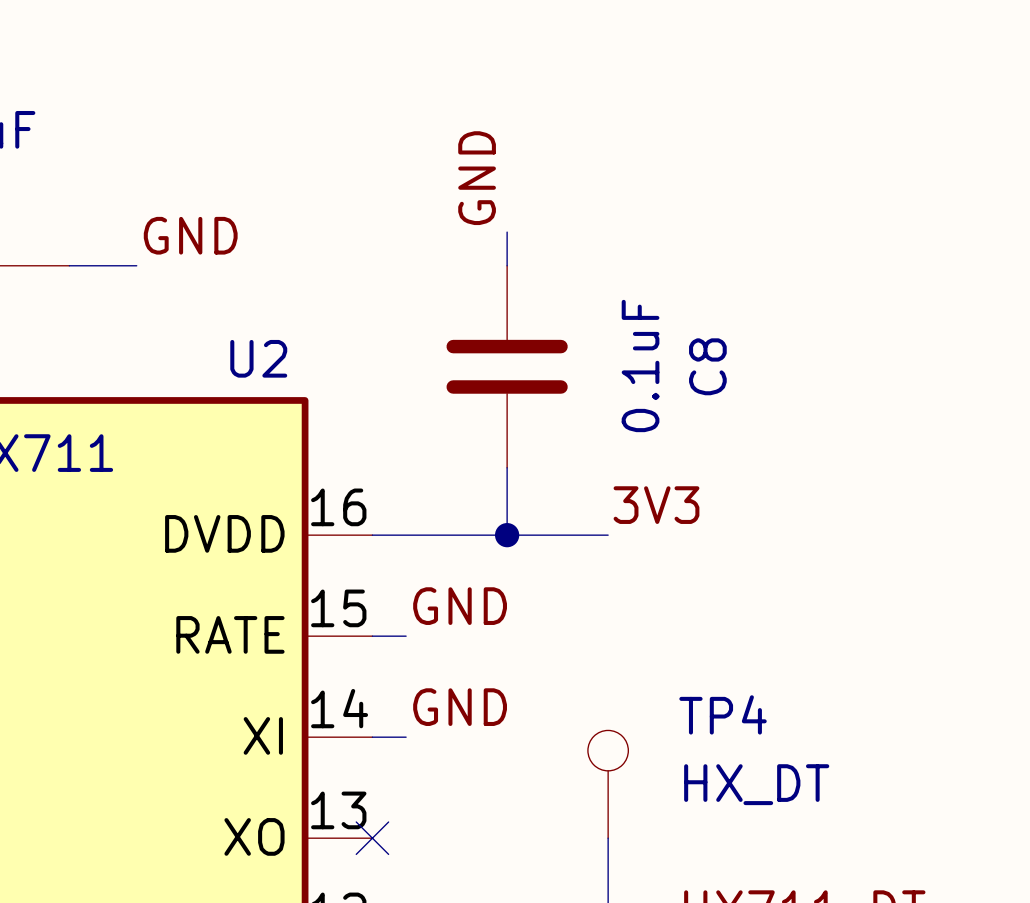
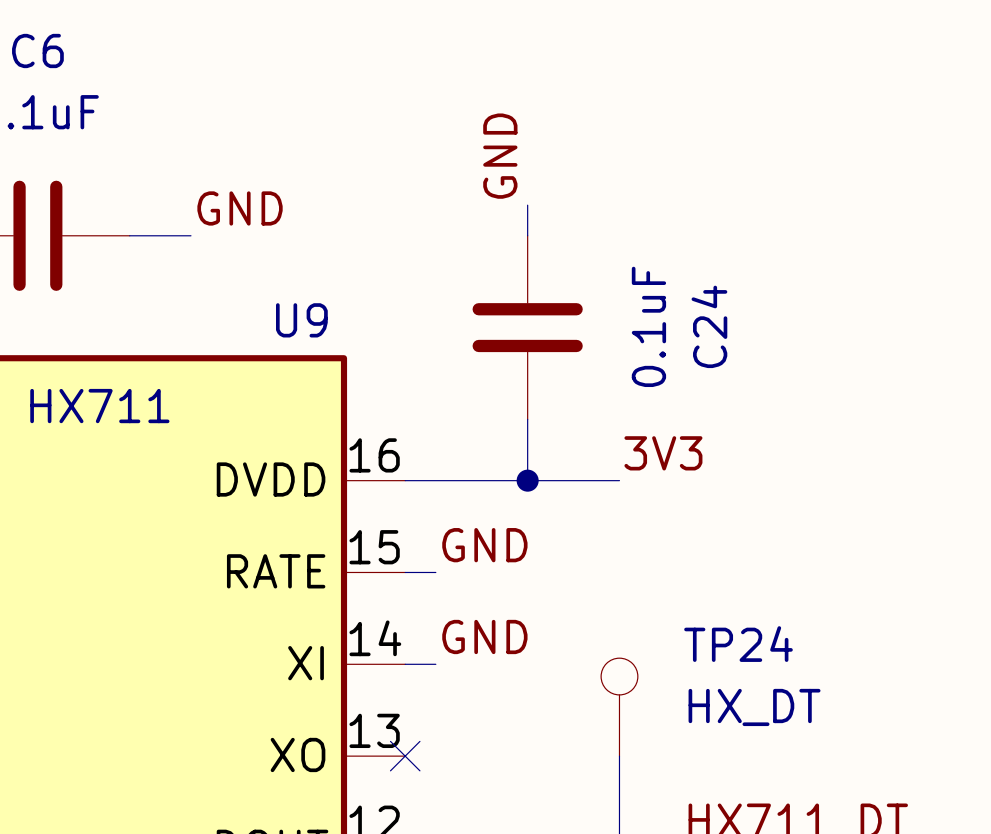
U2 name: U2 (258, 358) -> U9 (301, 320)
C8 name: C8 (707, 366) -> C24 (709, 326)
TP4 name: TP4 (723, 714) -> TP24 (738, 644)

